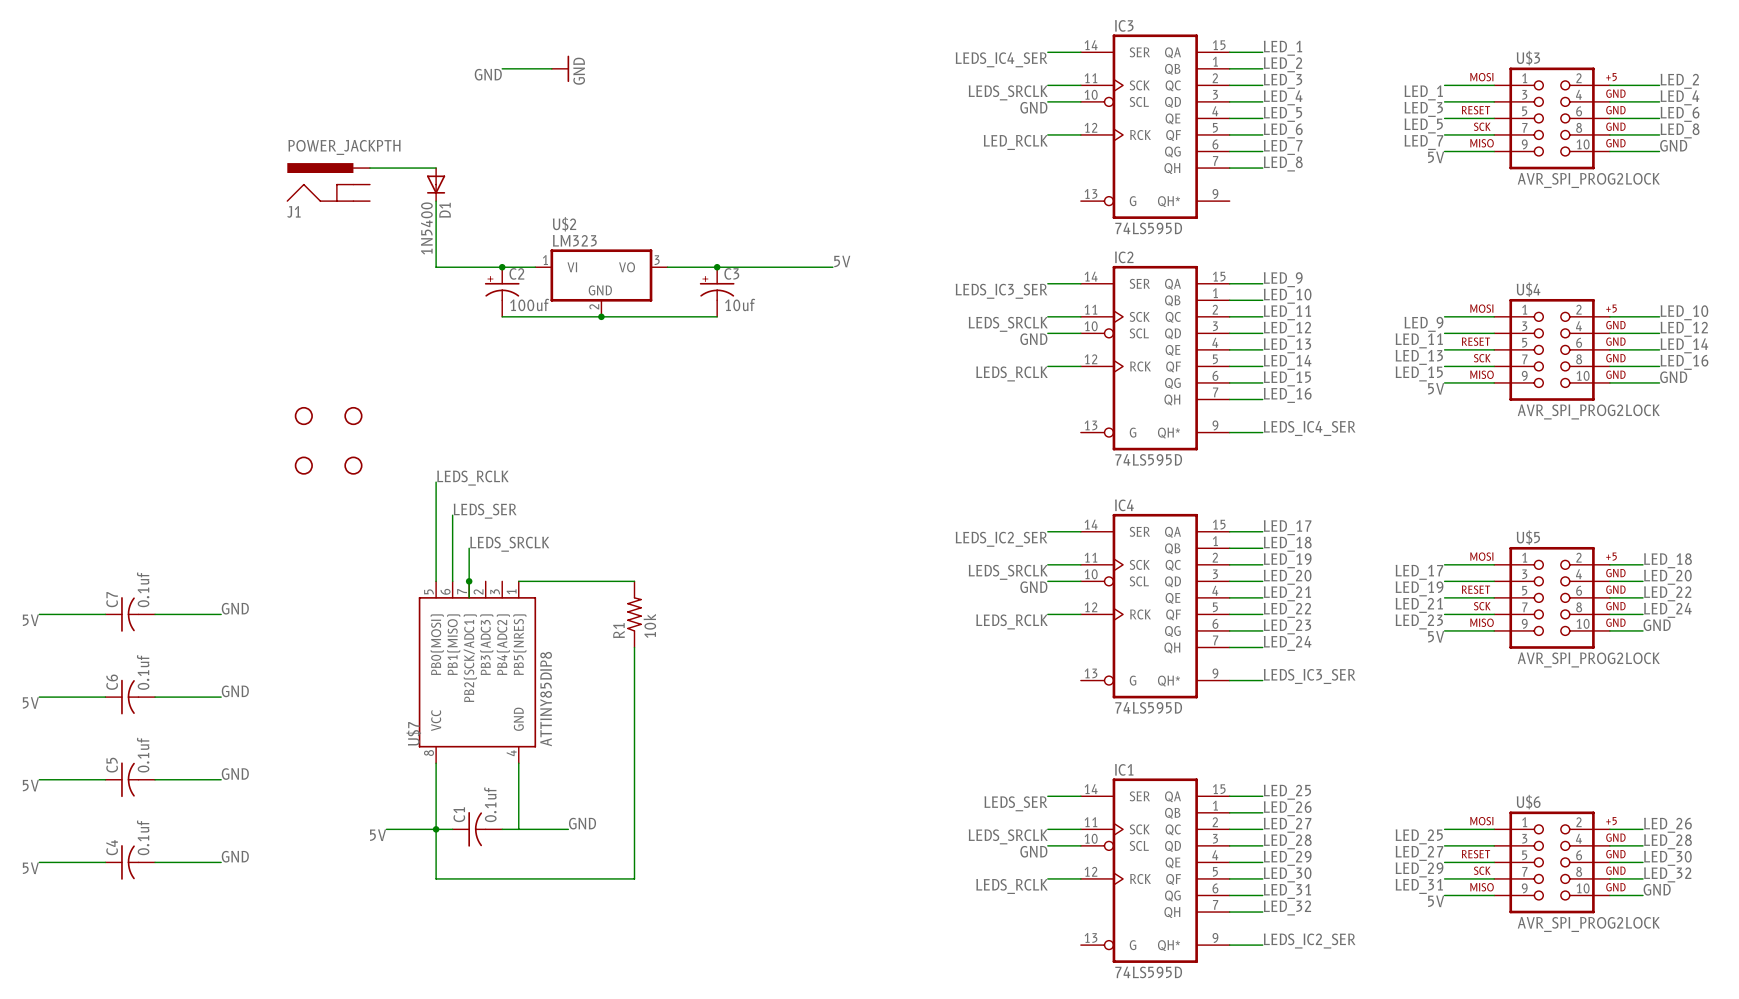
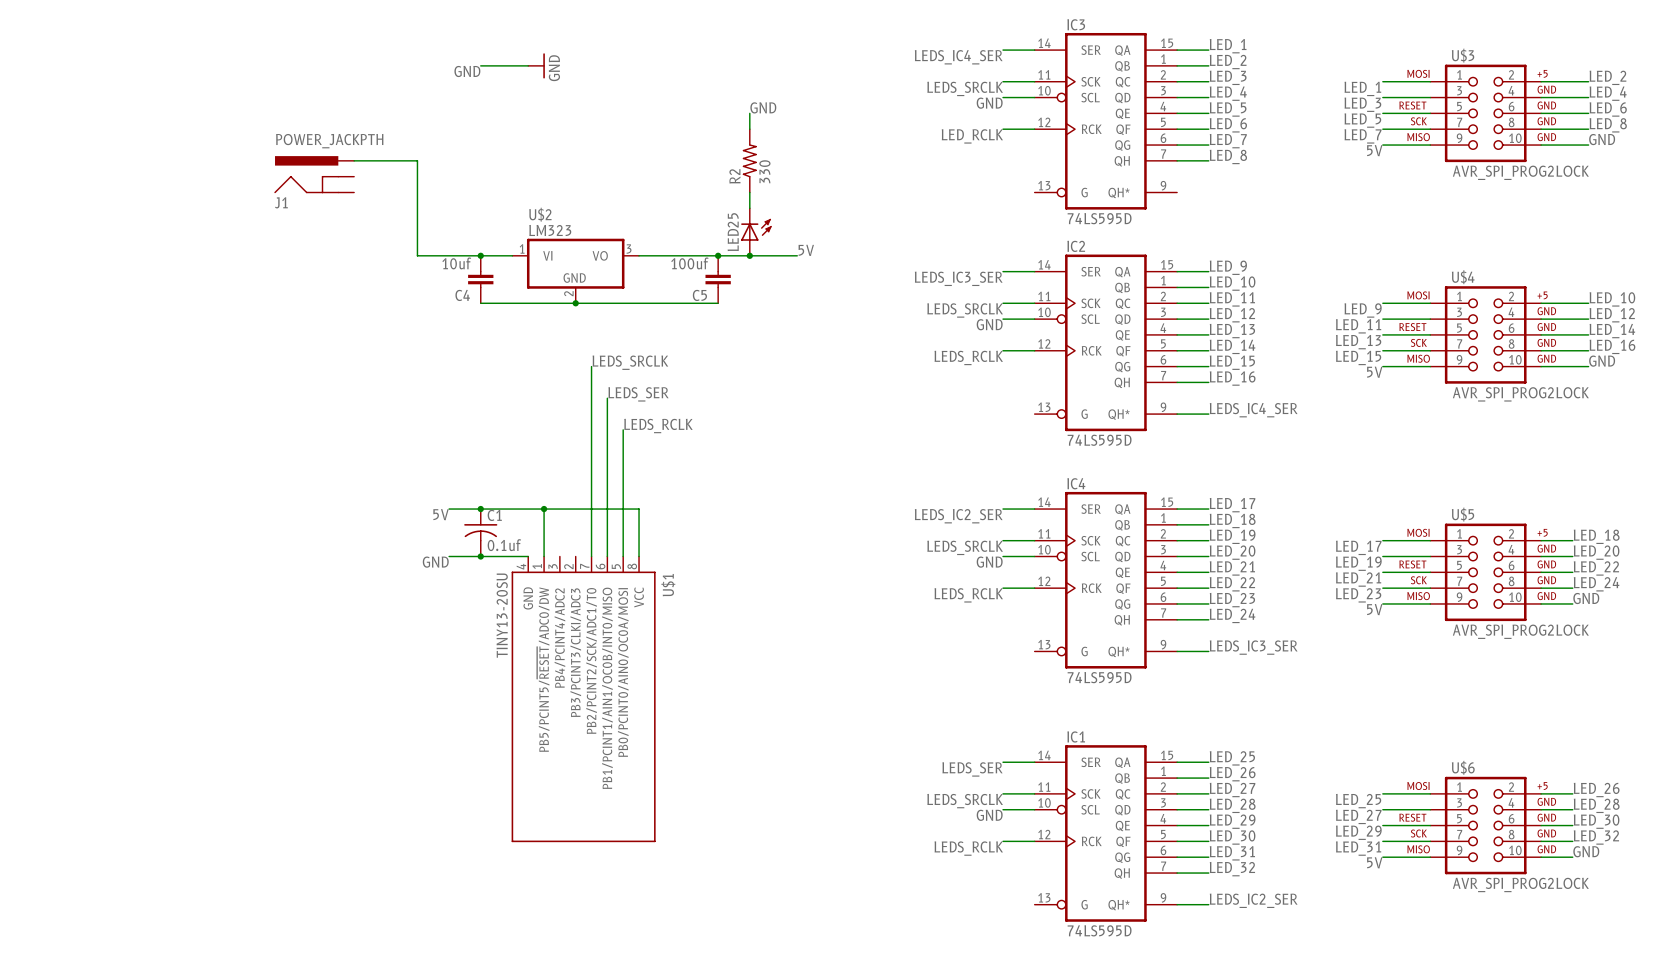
label: none -> GND (763, 107)
wire: none -> (749, 113) (749, 129)
R2: none -> 330 (749, 160)
D1: 1N5400 (436, 184) -> none
wire: none -> (749, 192) (749, 208)
LED25: none -> (756, 232)
junction: (717, 267) -> none
junction: none -> (718, 255)
junction: none -> (749, 255)
C2: 100uf (502, 292) -> none
C3: 10uf (717, 292) -> none
wire: none -> (686, 303) (718, 303)
label: none -> LEDS_SRCLK (630, 362)
wire: none -> (591, 366) (591, 556)
label: none -> LEDS_SER (638, 394)
part: (303, 416) -> none
part: (353, 416) -> none
label: none -> LEDS_RCLK (658, 426)
wire: none -> (623, 429) (623, 556)
part: (303, 465) -> none
part: (353, 465) -> none
label: LEDS_RCLK (472, 478) -> none
wire: (436, 482) (436, 581) -> none
label: LEDS_SER (485, 511) -> none
wire: (452, 515) (452, 581) -> none
wire: none -> (449, 509) (639, 509) (639, 556)
junction: none -> (480, 509)
junction: none -> (544, 509)
label: none -> 5V (441, 514)
label: LEDS_SRCLK (509, 544) -> none
wire: (469, 548) (469, 597) -> (544, 509) (544, 556)
wire: none -> (449, 556) (496, 556)
junction: (469, 581) -> none
junction: none -> (480, 556)
wire: (551, 581) (634, 581) -> (607, 398) (607, 556)
label: none -> GND (435, 562)
label: GND (235, 608) -> none
wire: (39, 614) (105, 614) -> none
C7: 0.1uf (130, 614) -> none
wire: (155, 614) (221, 614) -> none
R1: 10k (634, 614) -> none
label: 5V (30, 620) -> none
wire: (634, 647) (634, 878) (436, 878) (436, 763) -> none
U$7: ATTINY85DIP8 (477, 672) -> none
label: GND (235, 691) -> none
wire: (39, 697) (105, 697) -> none
C6: 0.1uf (130, 697) -> none
wire: (155, 697) (221, 697) -> none
label: 5V (30, 702) -> none
U$1: none -> TINY13-20SU (583, 699)
C5 value: 0.1uf (143, 755) -> 100uf (689, 263)
C5 symbol: [105, 762, 156, 798] -> [705, 255, 731, 304]
wire: (518, 763) (518, 829) -> none
C5 name position: C5 (112, 765) -> C5 (699, 295)
label: GND (235, 774) -> none
wire: (39, 779) (105, 779) -> none
wire: (155, 779) (221, 779) -> none
label: 5V (30, 785) -> none
label: GND (582, 823) -> none
wire: (386, 829) (452, 829) -> none
junction: (436, 829) -> none
C1 rotation: 0° (477, 829) -> 90° clockwise (480, 532)
C1 position: (477, 829) -> (480, 532)
wire: (502, 829) (568, 829) -> none
label: 5V (378, 835) -> none
C4 value: 0.1uf (143, 837) -> 10uf (456, 263)
C4 symbol: [105, 845, 156, 880] -> [468, 255, 494, 304]
C4 name position: C4 (112, 847) -> C4 (462, 295)
label: GND (235, 856) -> none
wire: (39, 862) (105, 862) -> none
wire: (155, 862) (221, 862) -> none
label: 5V (30, 868) -> none

